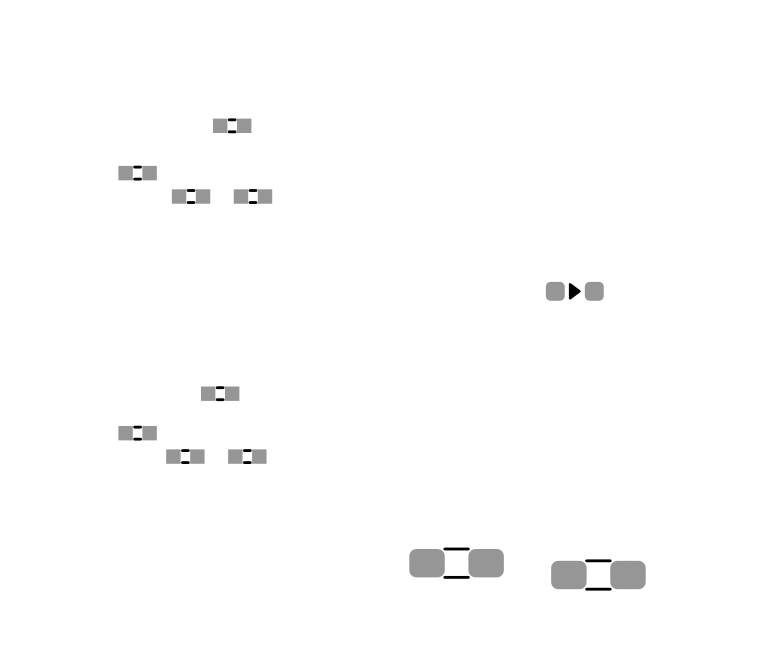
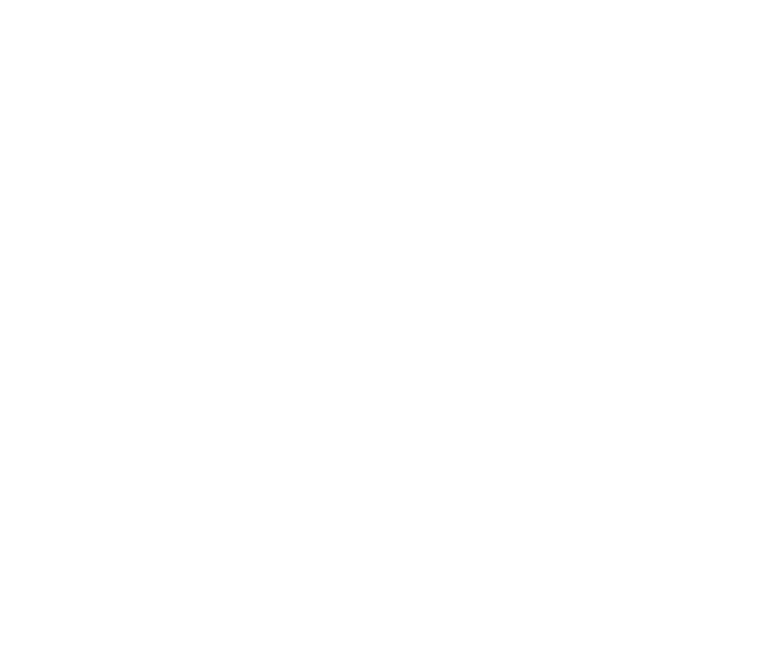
part: (232, 125) -> none
part: (137, 173) -> none
part: (191, 196) -> none
part: (252, 196) -> none
part: (574, 291) -> none
part: (220, 393) -> none
part: (137, 433) -> none
part: (185, 456) -> none
part: (247, 456) -> none
part: (456, 563) -> none
part: (598, 575) -> none

